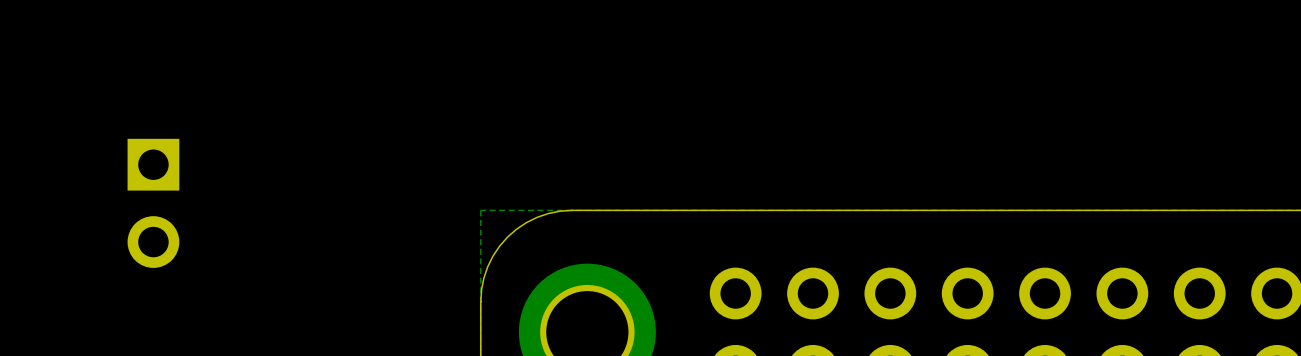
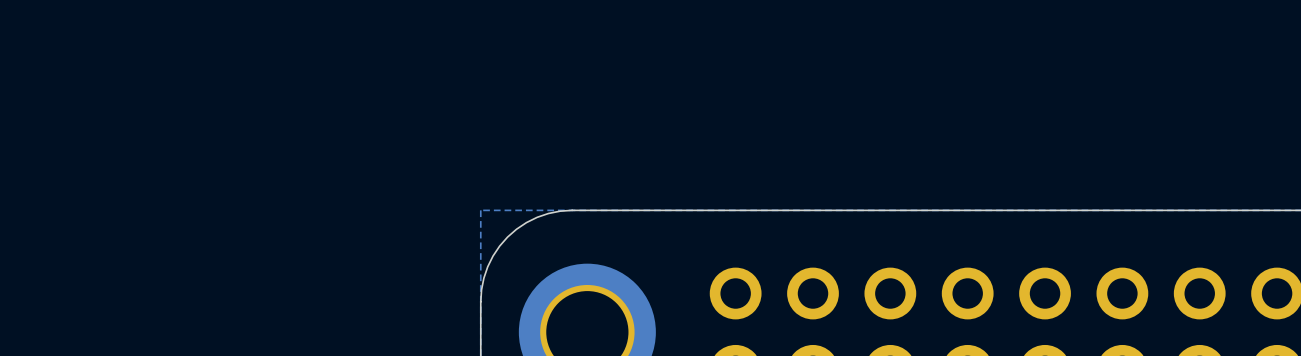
part: (153, 203) -> none

